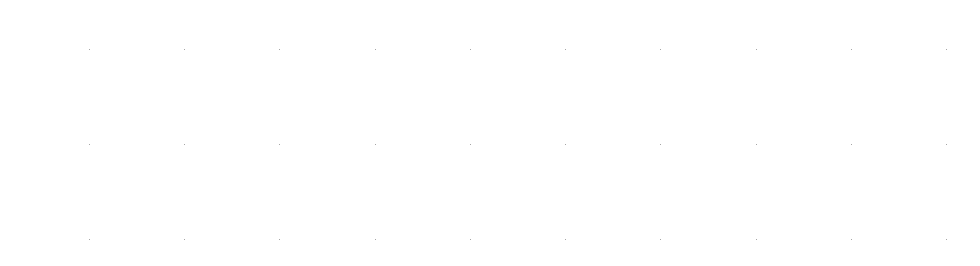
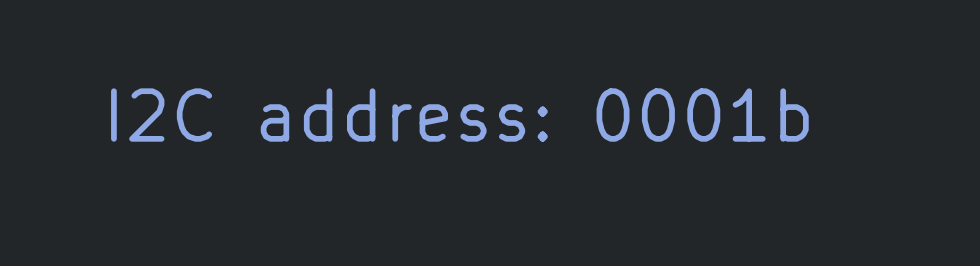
text: none -> I2C address: 0001b (459, 115)

